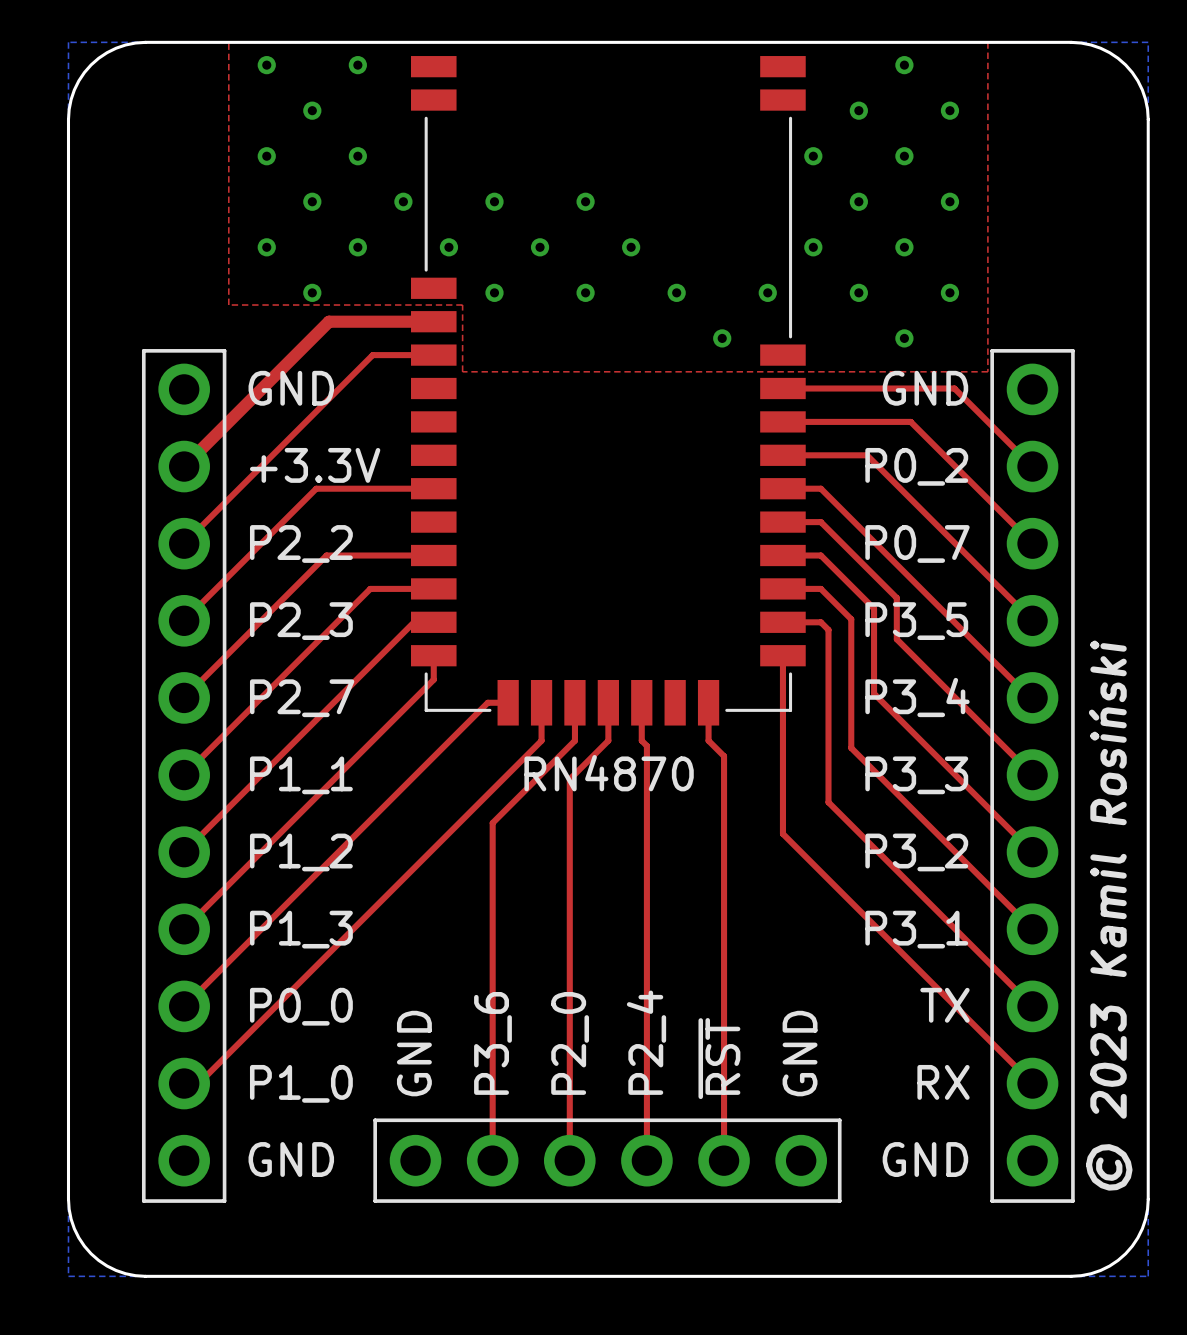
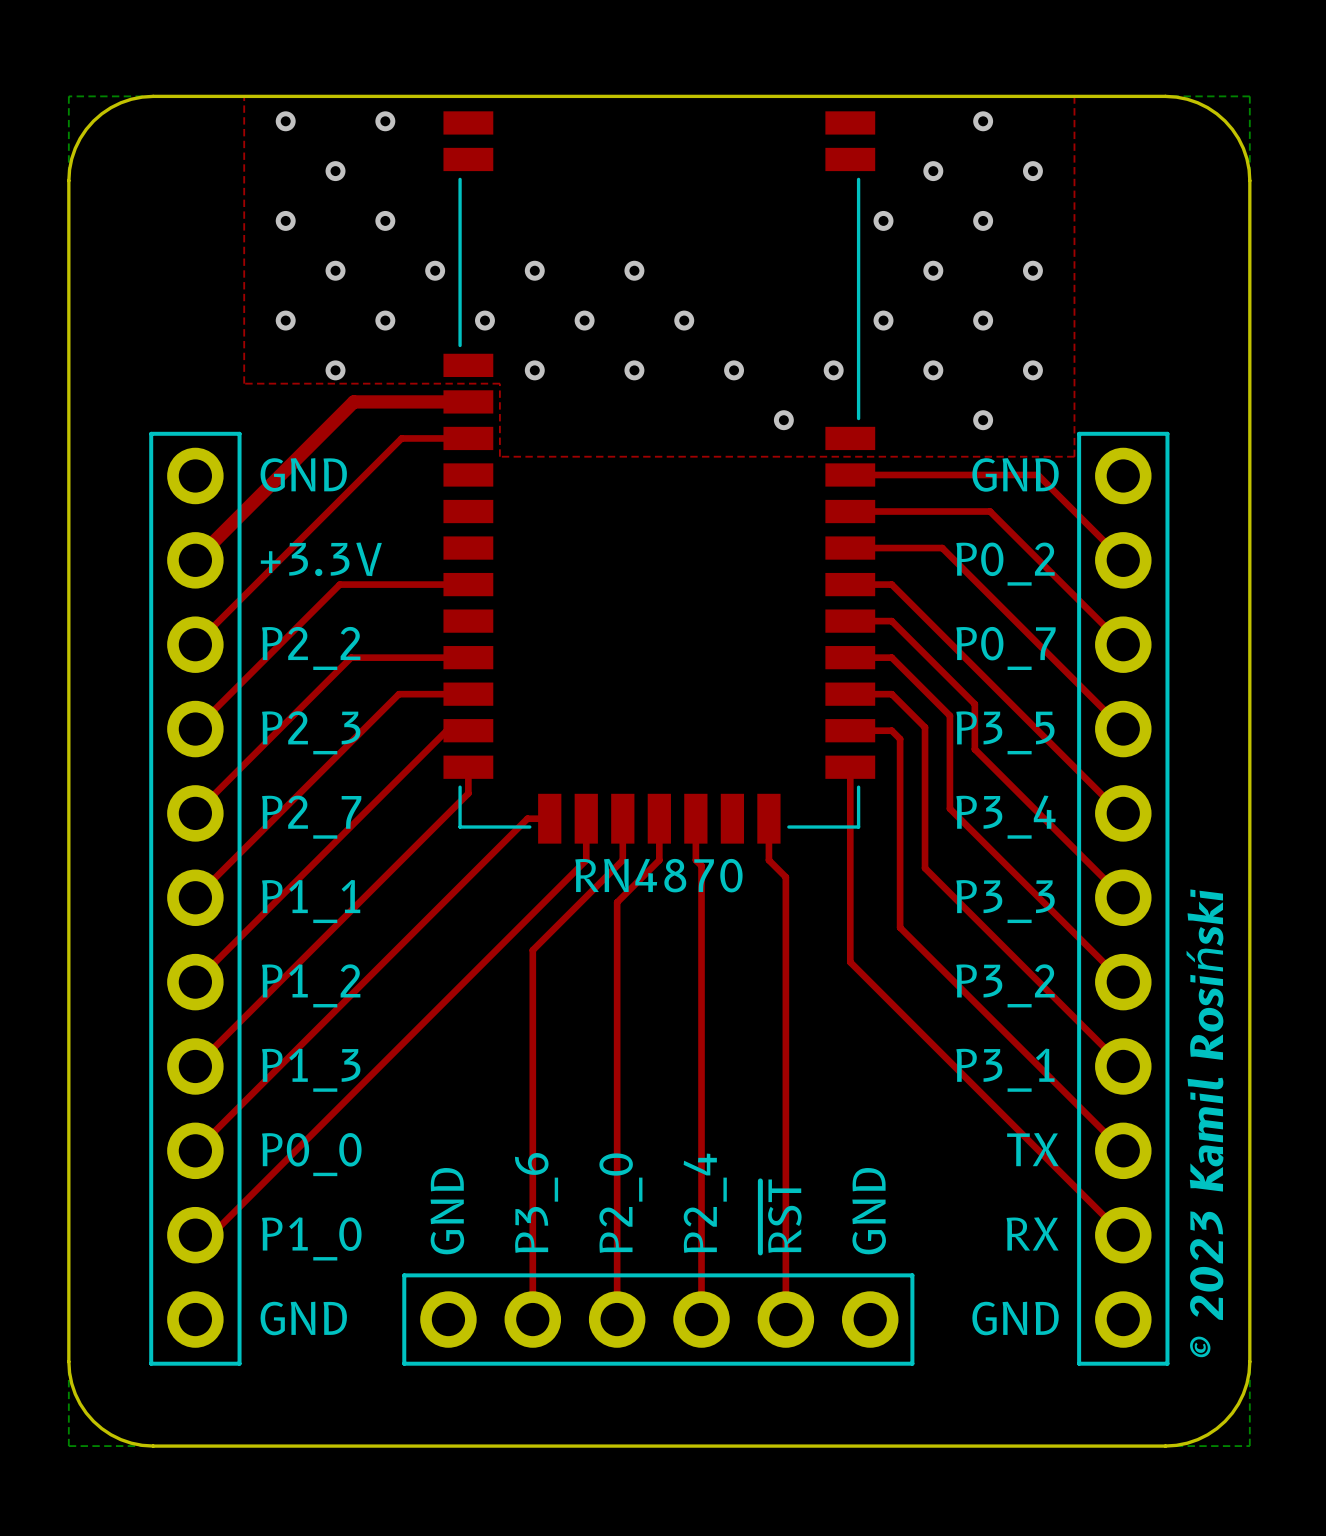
part value: none -> RN4870 (658, 875)
part text: RN4870 (609, 773) -> none

